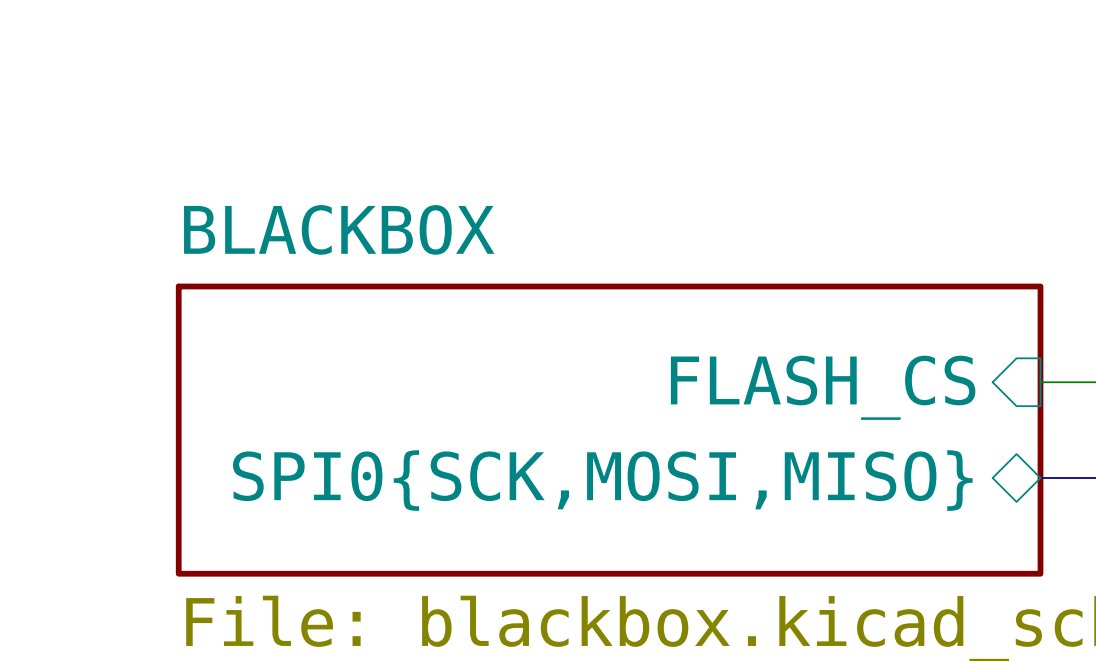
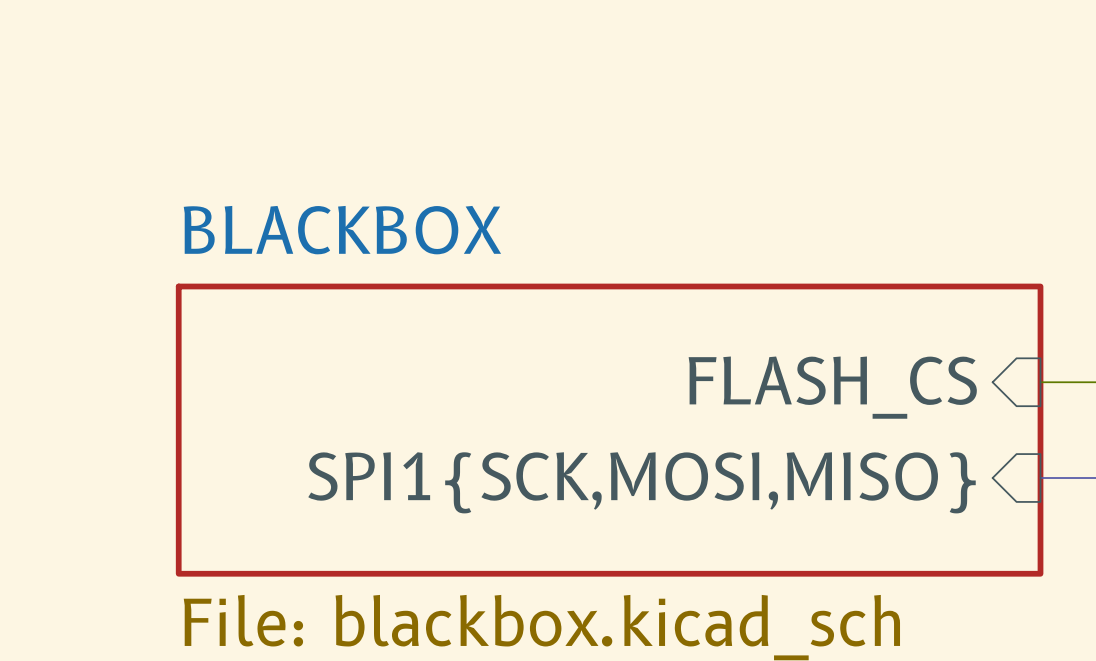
sheet pin shape: bidirectional (602, 480) -> input (642, 482)
sheet pin: SPI0{SCK,MOSI,MISO} (602, 480) -> SPI1{SCK,MOSI,MISO} (642, 482)

